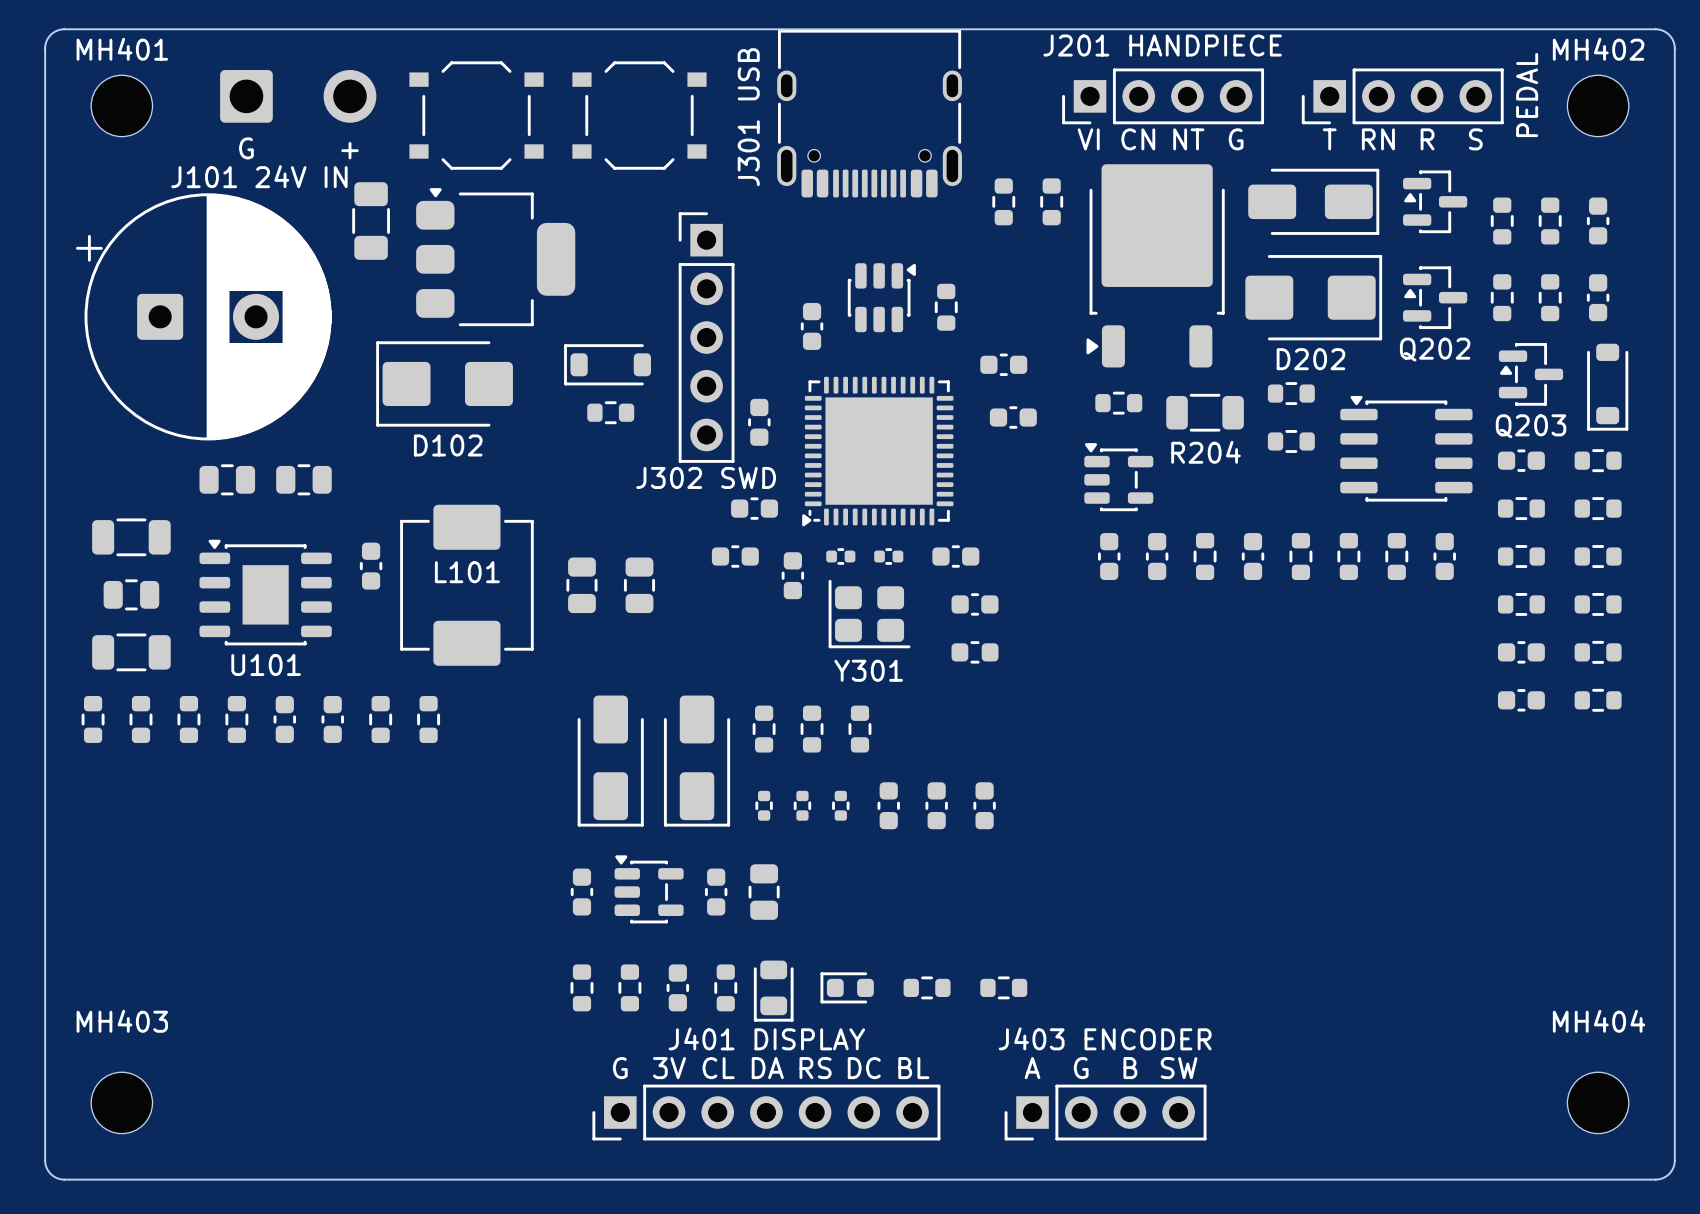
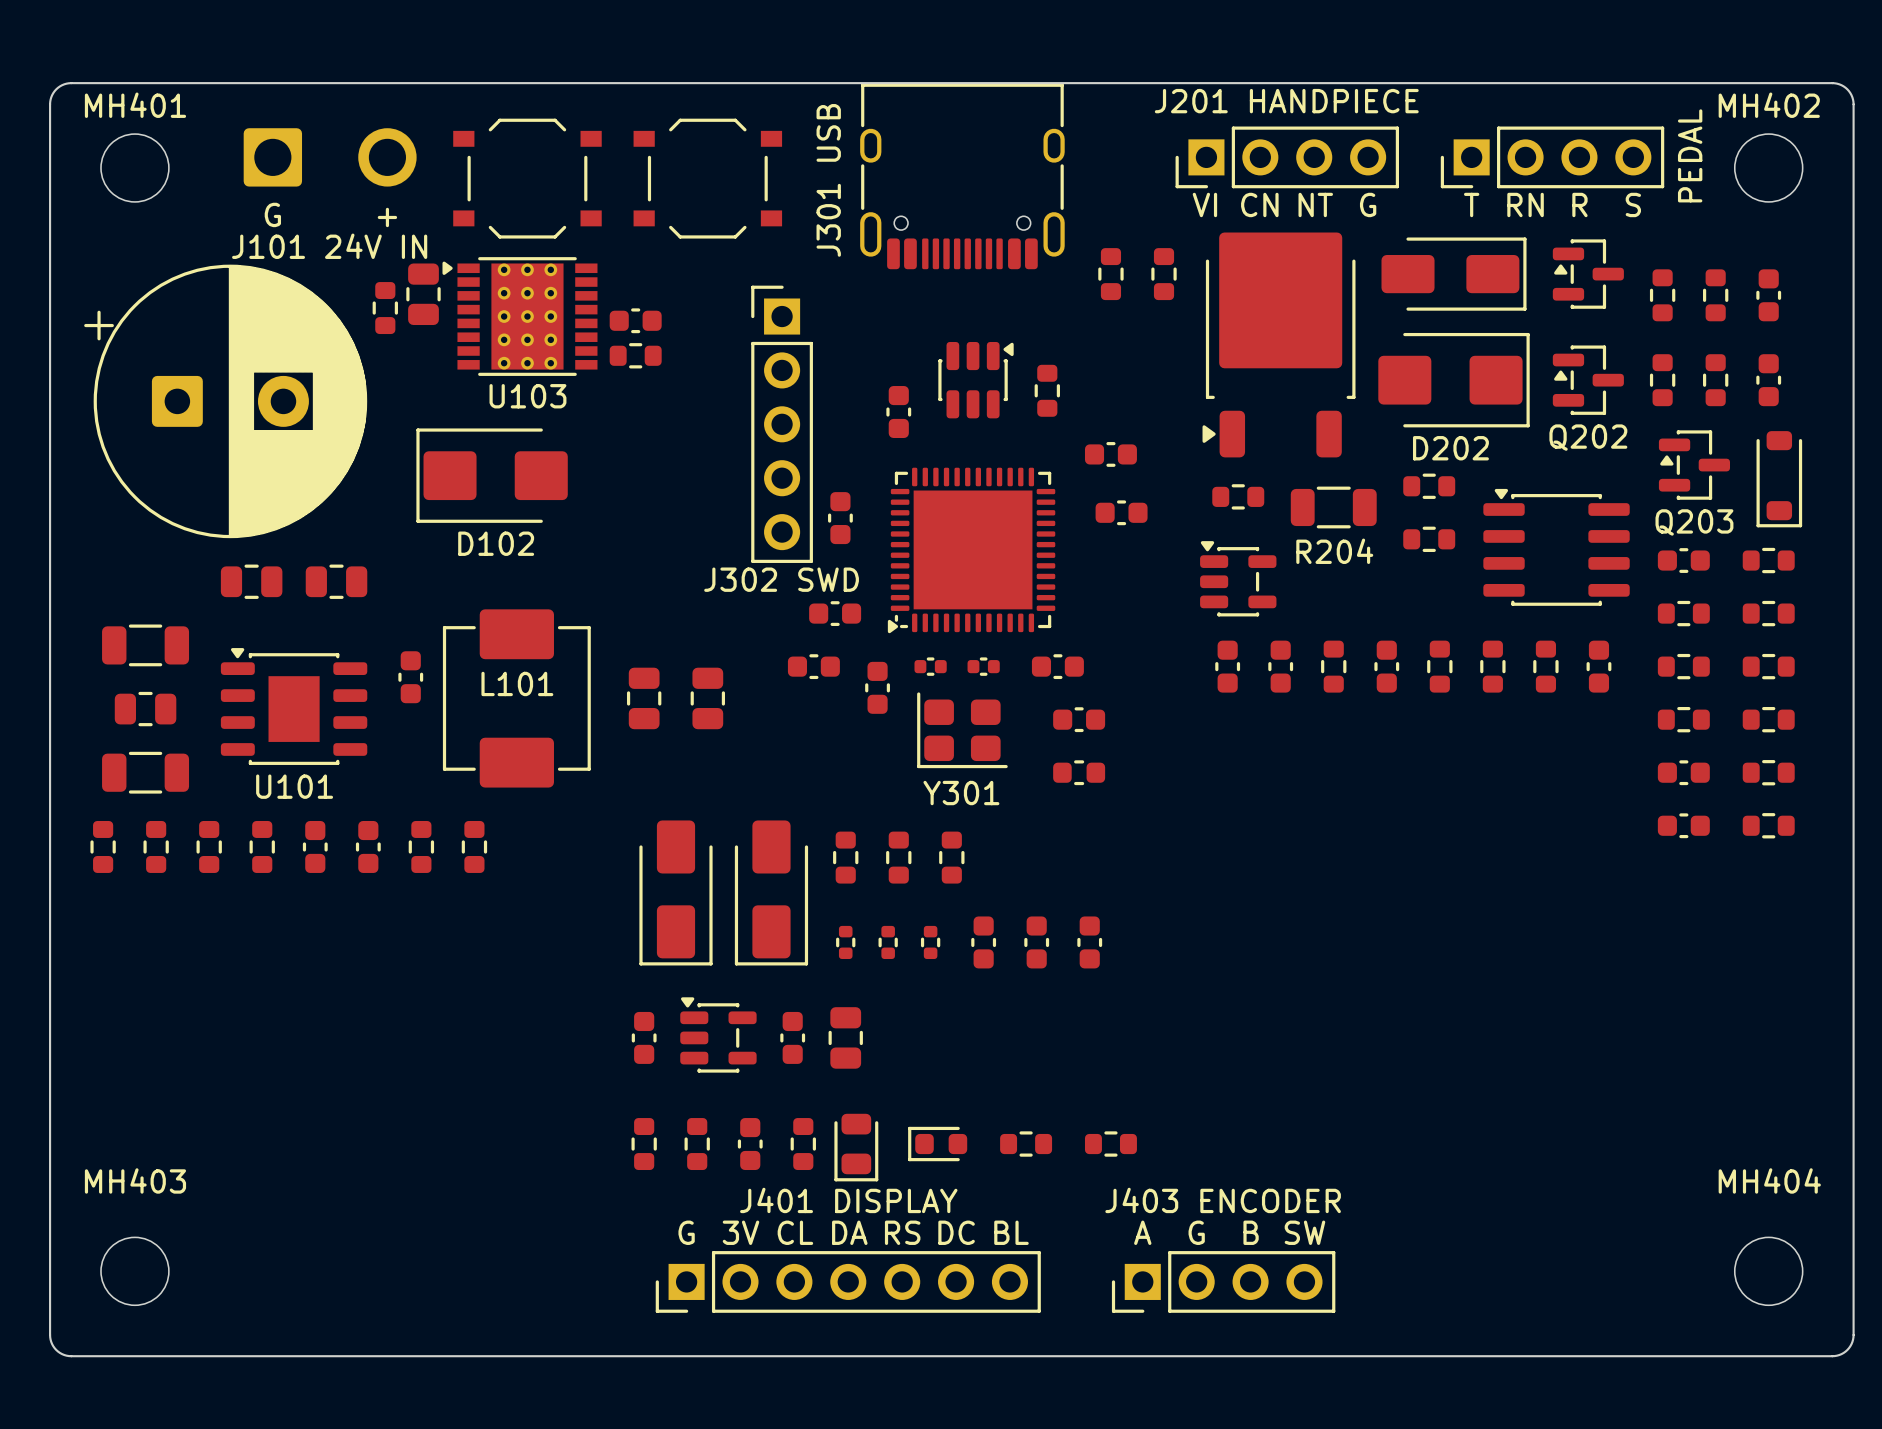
text position: J101 24V IN (259, 176) -> J101 24V IN (329, 246)
part footprint: [352, 182, 390, 260] -> [406, 263, 441, 326]
part: none -> (385, 308)
U103: none -> (519, 316)
part: none -> (635, 320)
part: (495, 257) -> none
part: (607, 364) -> none
part position: (610, 412) -> (635, 355)

